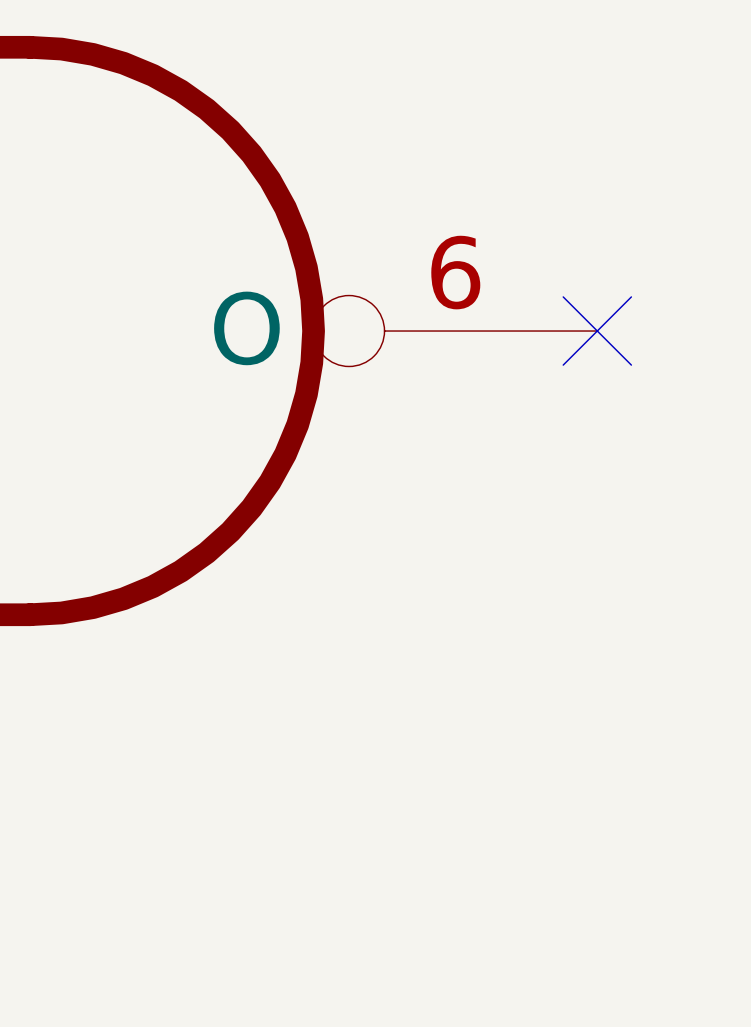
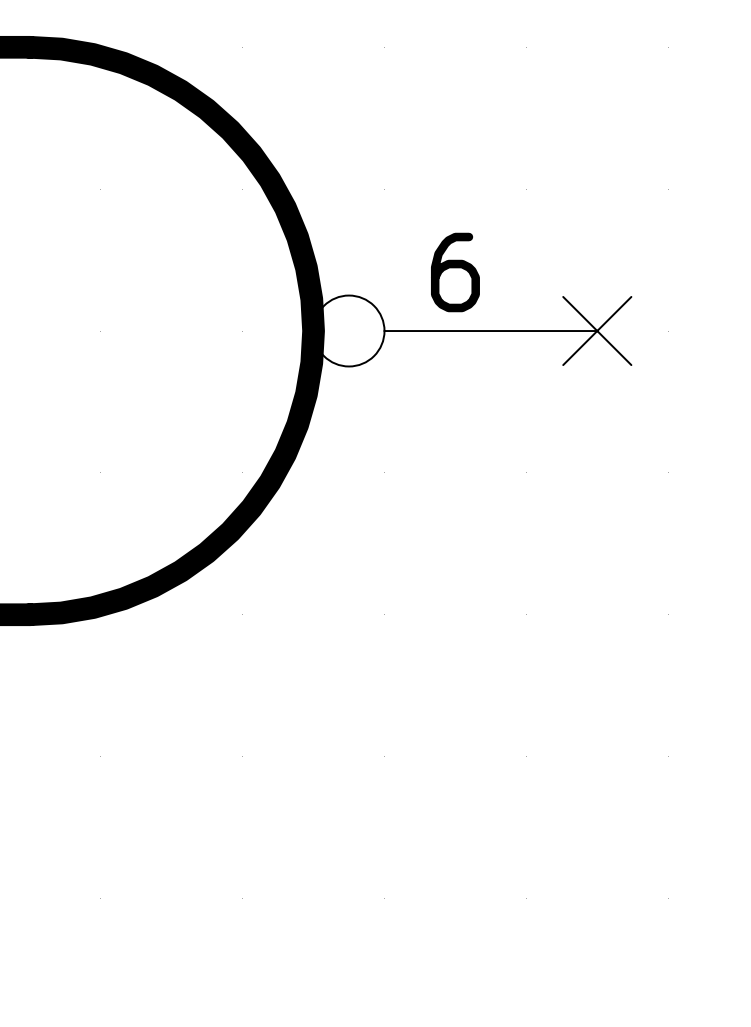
part pin name: O (246, 328) -> none

